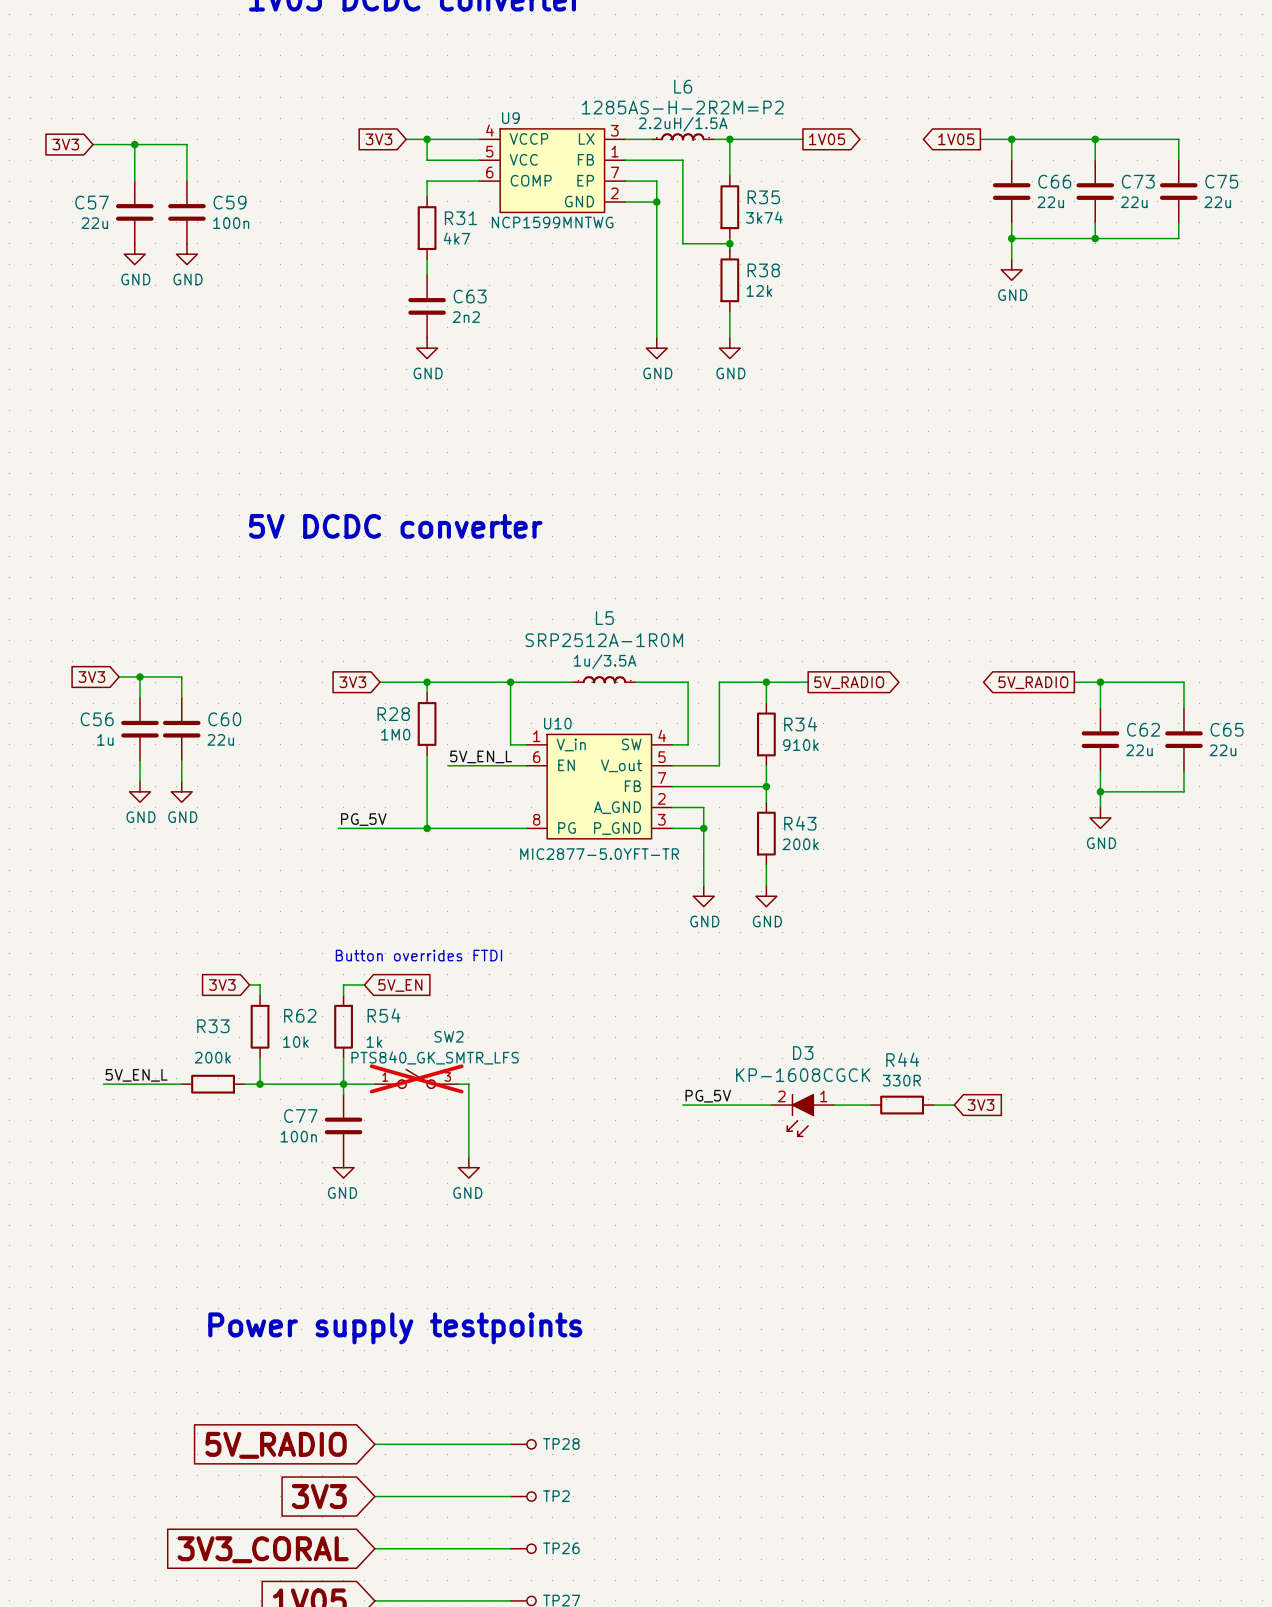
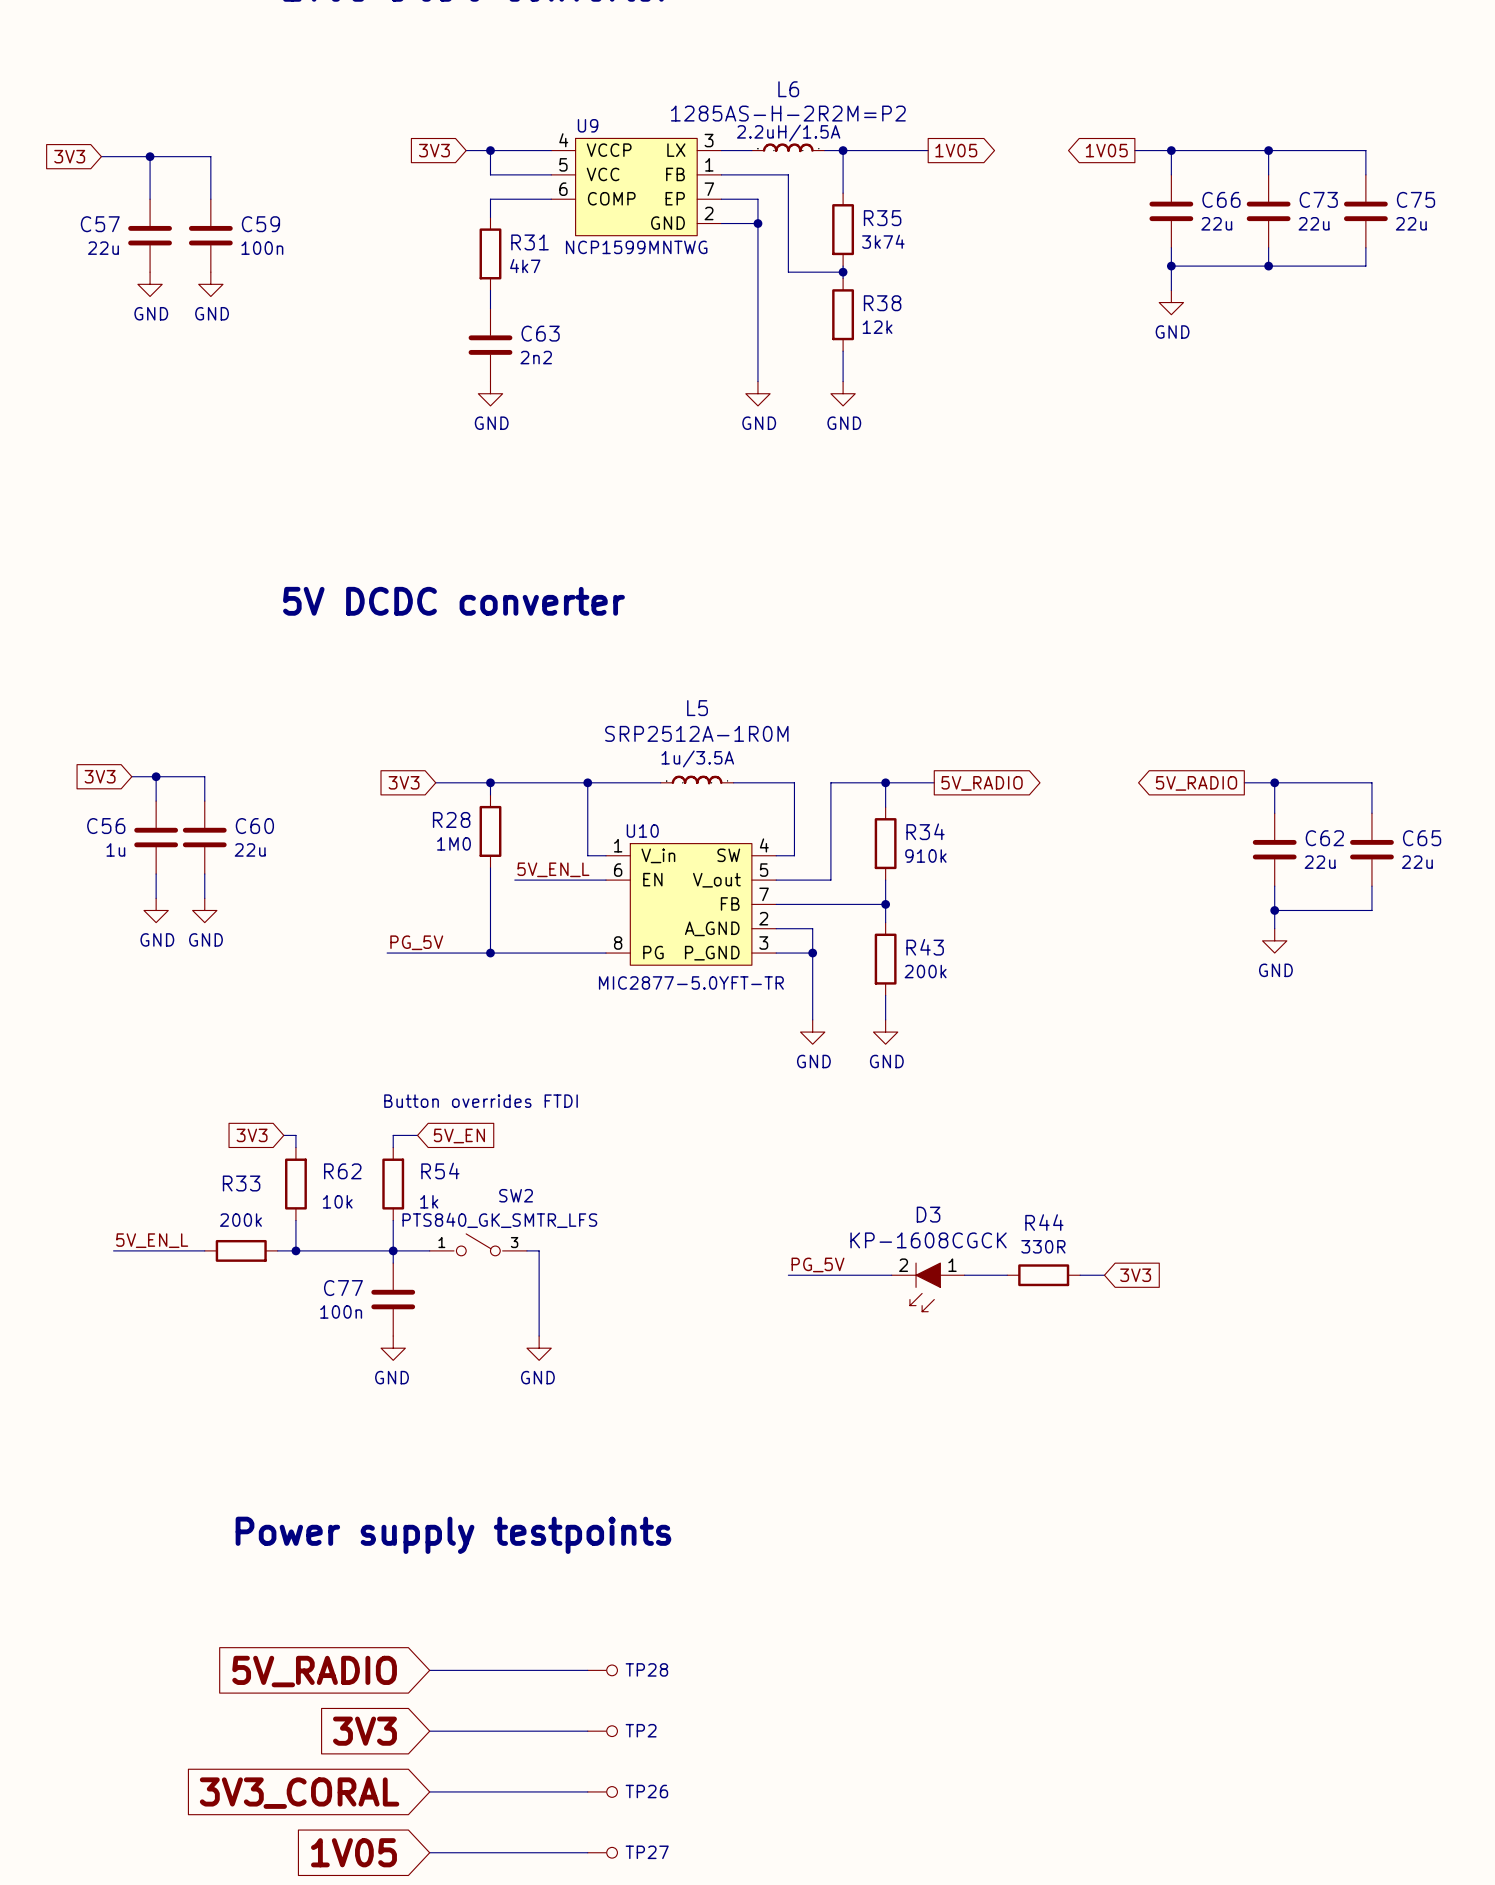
SW2 do-not-place cross: (416, 1078) -> none

